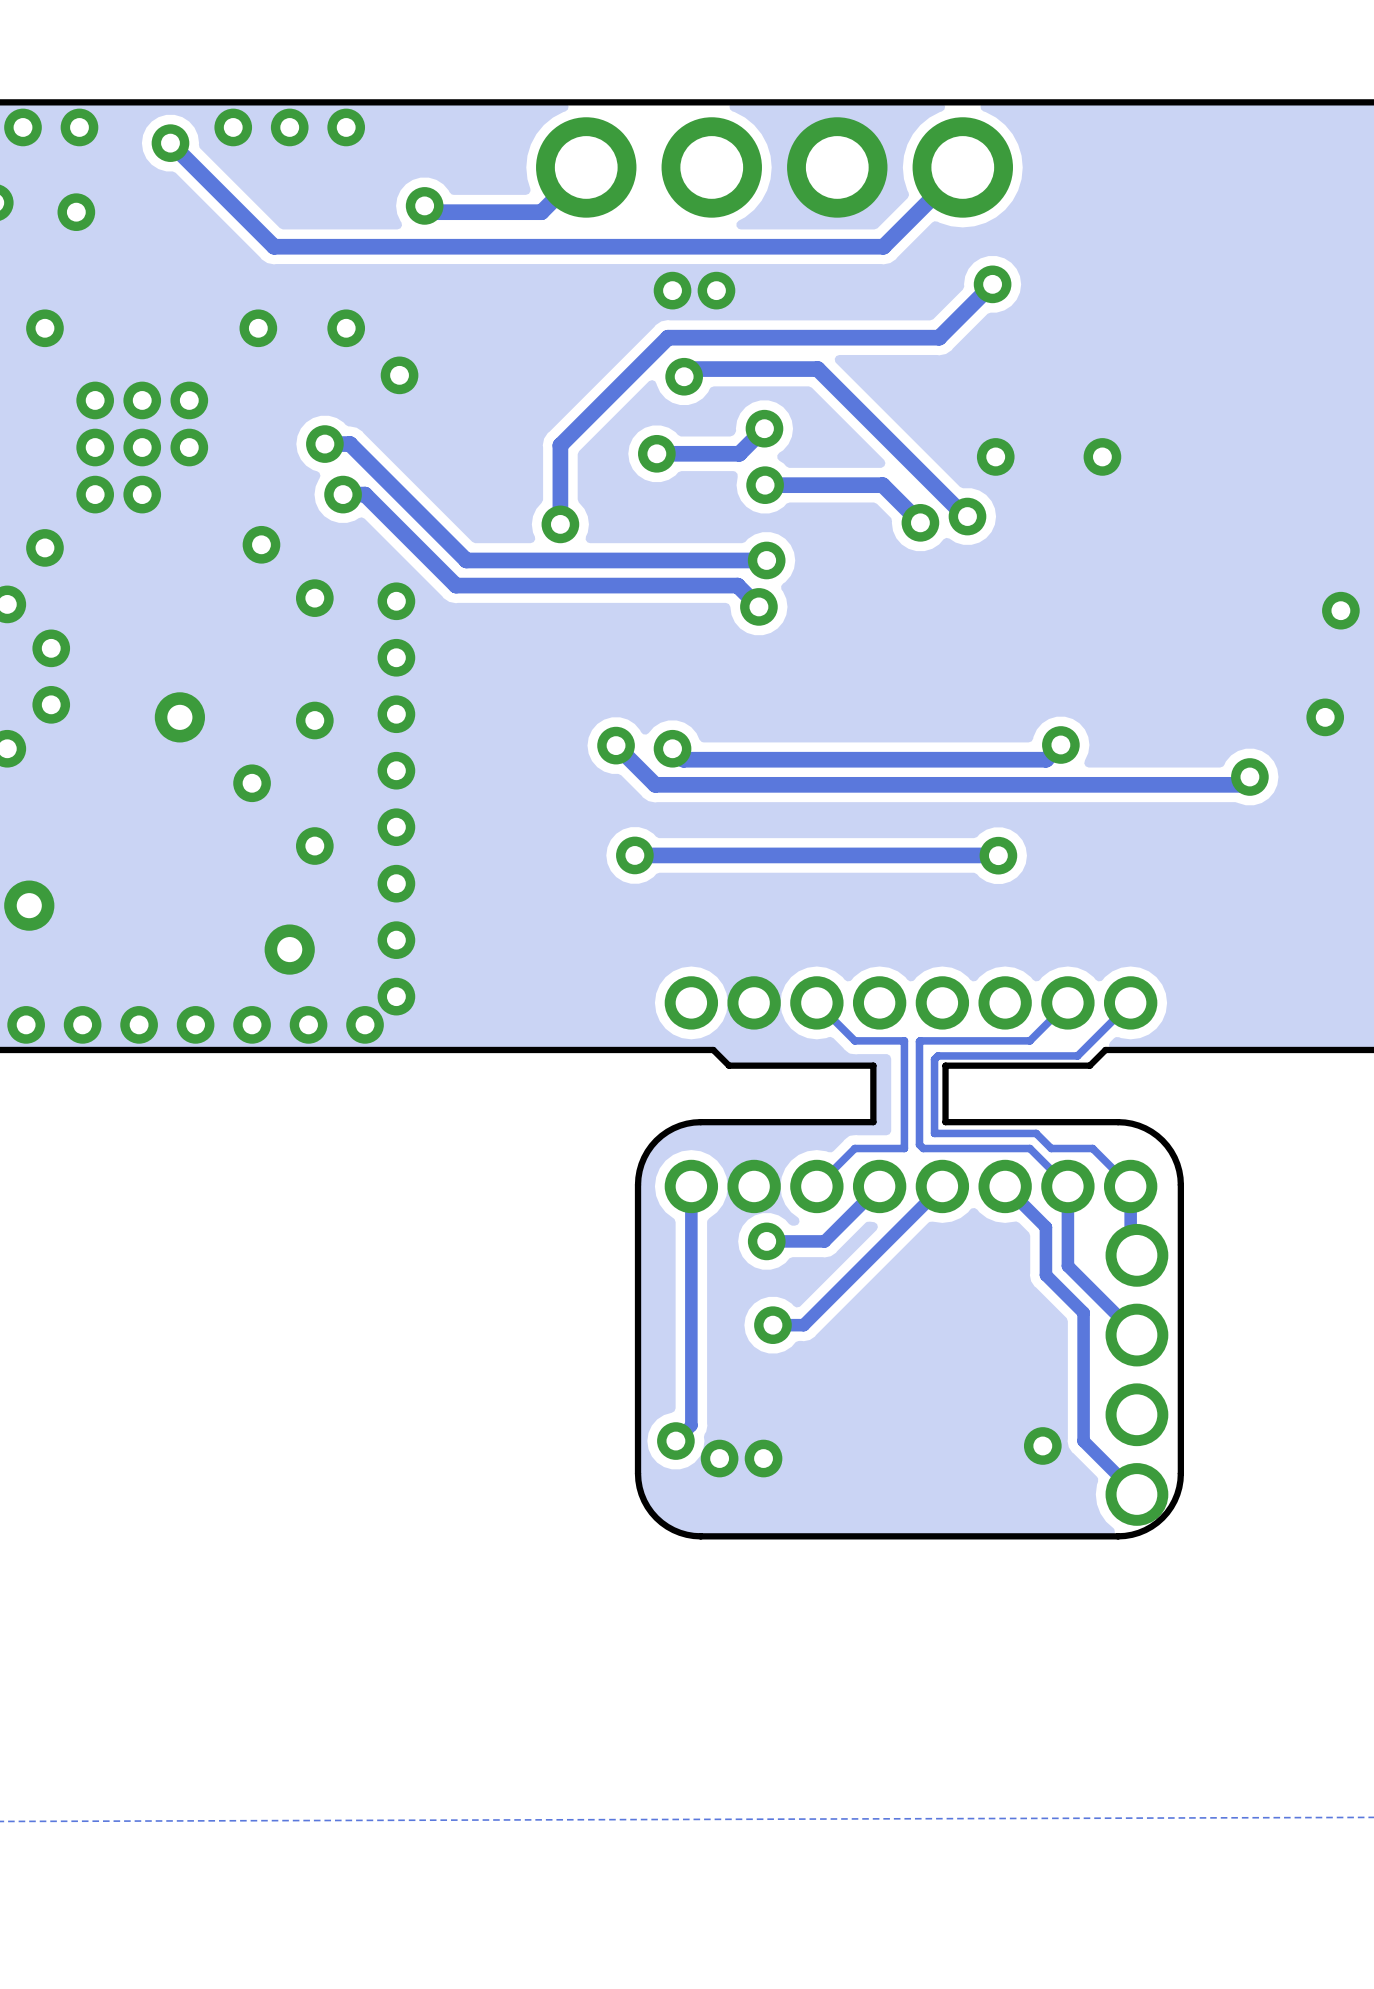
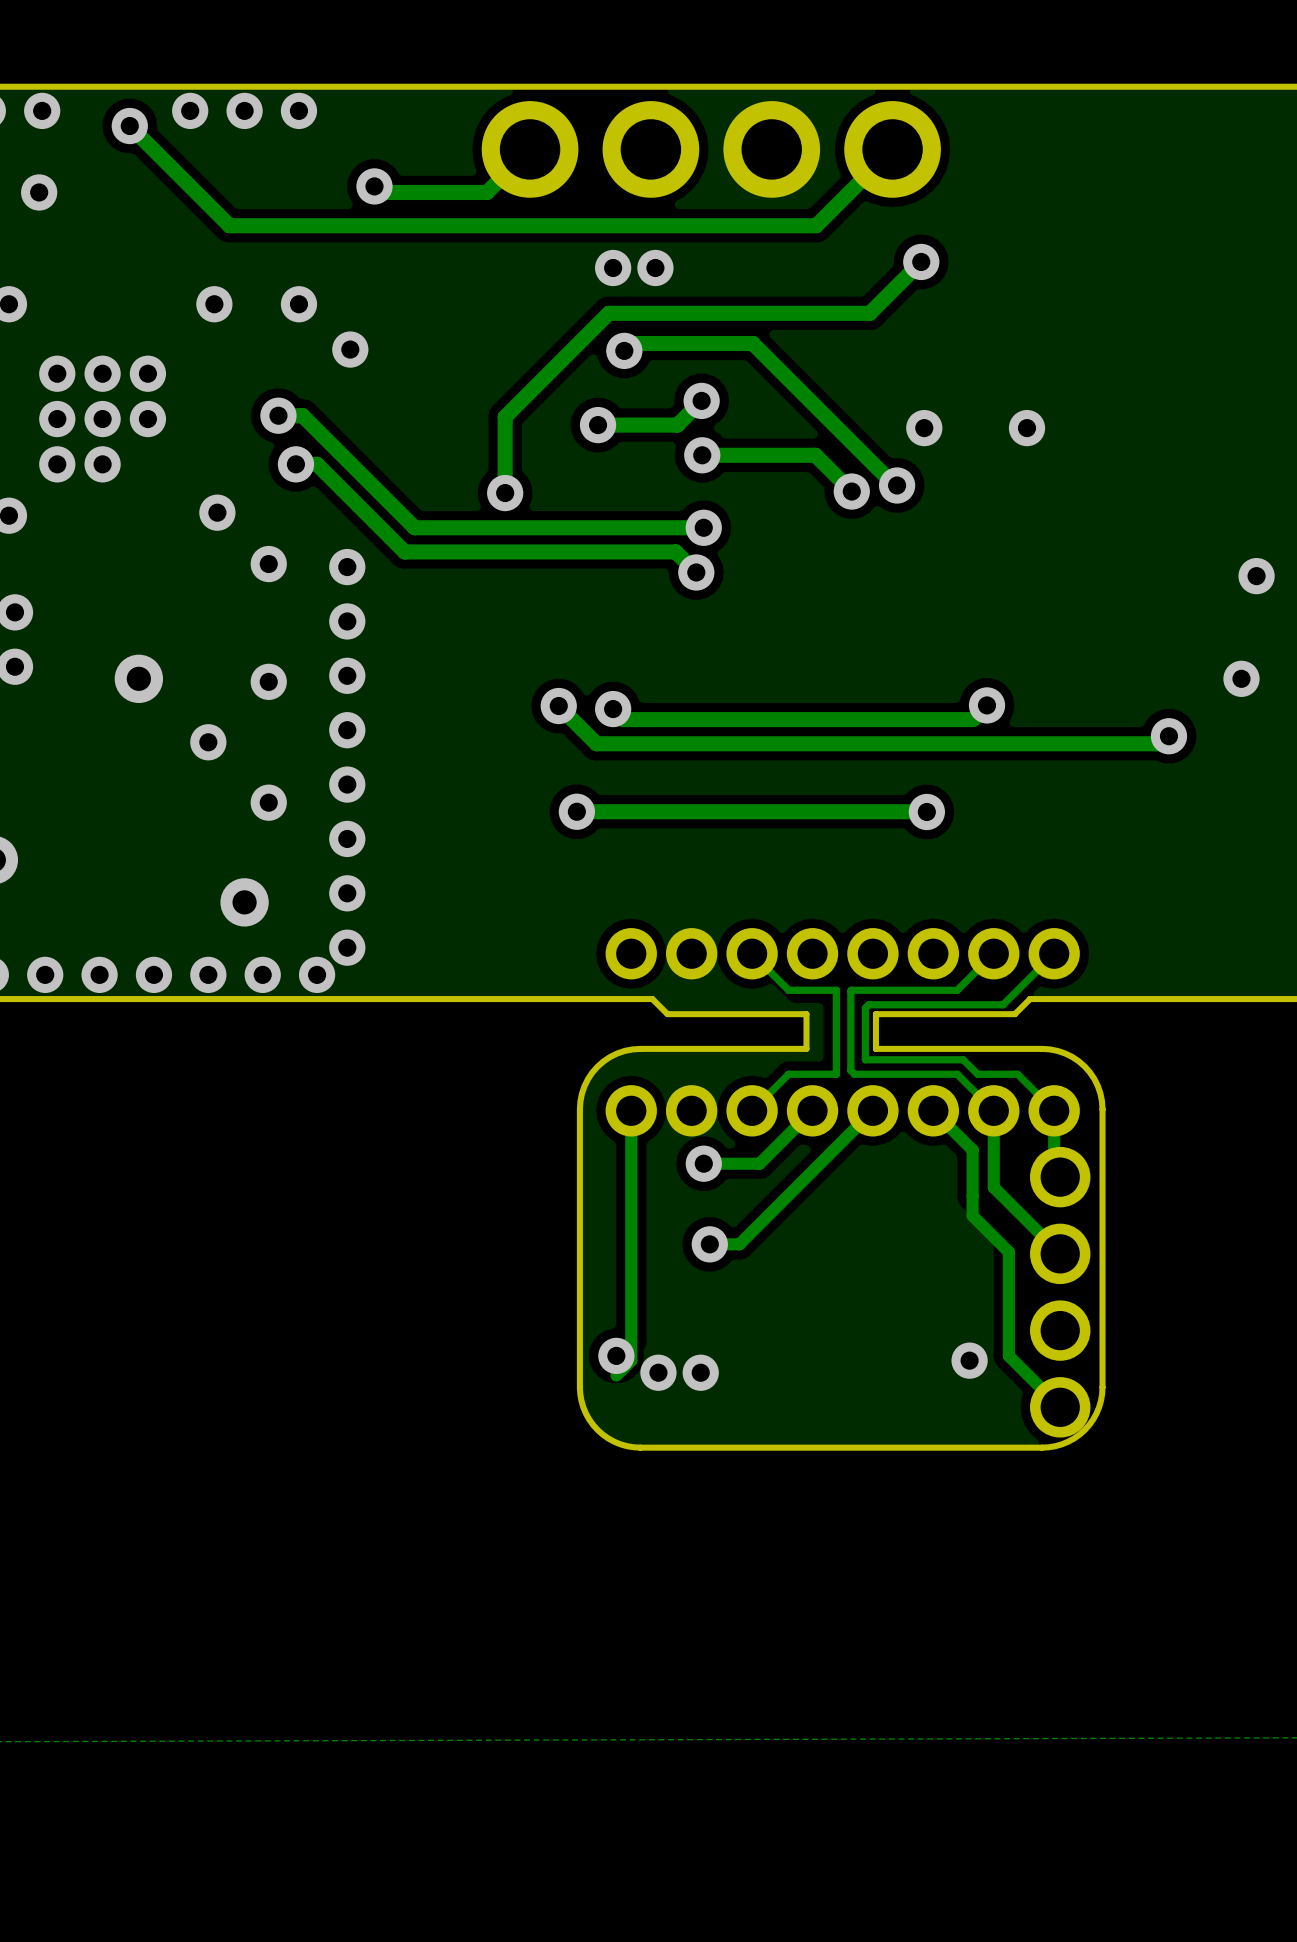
board edge: (873, 1101) (873, 1122) (700, 1122) (680, 1125) (661, 1135) (651, 1145) (641, 1164) (638, 1184) -> (806, 1048) (640, 1048) (617, 1053) (597, 1066) (588, 1079) (580, 1101) (579, 1128)
board edge: (945, 1101) (945, 1122) (1118, 1122) (1138, 1125) (1151, 1131) (1167, 1145) (1177, 1164) (1180, 1184) -> (875, 1048) (1042, 1048) (1065, 1053) (1078, 1061) (1094, 1079) (1102, 1101) (1102, 1128)
track: (934, 1113) (934, 1133) (1036, 1133) (1051, 1148) (1092, 1148) (1130, 1186) -> (865, 1059) (963, 1059) (977, 1074) (1017, 1074) (1054, 1110) (1054, 1130)
track: (919, 1124) (919, 1144) (923, 1148) (1029, 1148) (1067, 1186) -> (850, 1070) (854, 1074) (957, 1074) (993, 1110) (993, 1130)
track: (904, 1128) (904, 1148) (854, 1148) (816, 1186) -> (836, 1074) (788, 1074) (752, 1110)
track: (879, 1186) (824, 1241) (766, 1241) -> (812, 1110) (759, 1163) (703, 1163)
part position: (911, 1186) -> (842, 1110)
track: (942, 1186) (803, 1325) (772, 1325) -> (872, 1110) (739, 1244) (709, 1244)
track: (1005, 1186) (1045, 1227) -> (933, 1110) (972, 1150) (972, 1169)
via position: (766, 1241) -> (703, 1163)
track: (1067, 1245) (1067, 1266) (1136, 1335) -> (993, 1187) (1060, 1253)
via position: (772, 1325) -> (709, 1244)
part position: (1136, 1374) -> (1060, 1292)
track: (1083, 1420) (1083, 1441) (1136, 1494) -> (1008, 1355) (1060, 1407)
via position: (675, 1441) -> (616, 1355)
via position: (1042, 1445) -> (969, 1360)
board edge: (1180, 1453) (1179, 1487) (1174, 1500) (1167, 1512) (1157, 1522) (1145, 1530) (1132, 1534) (1118, 1536) (700, 1536) (686, 1534) (667, 1526) (656, 1517) (647, 1506) (639, 1487) (638, 1453) -> (1102, 1387) (1099, 1407) (1093, 1419) (1084, 1429) (1074, 1438) (1062, 1444) (1042, 1447) (633, 1447) (614, 1441) (597, 1429) (585, 1413) (581, 1400) (579, 1387)
via position: (719, 1458) -> (658, 1372)
via position: (763, 1458) -> (700, 1372)

